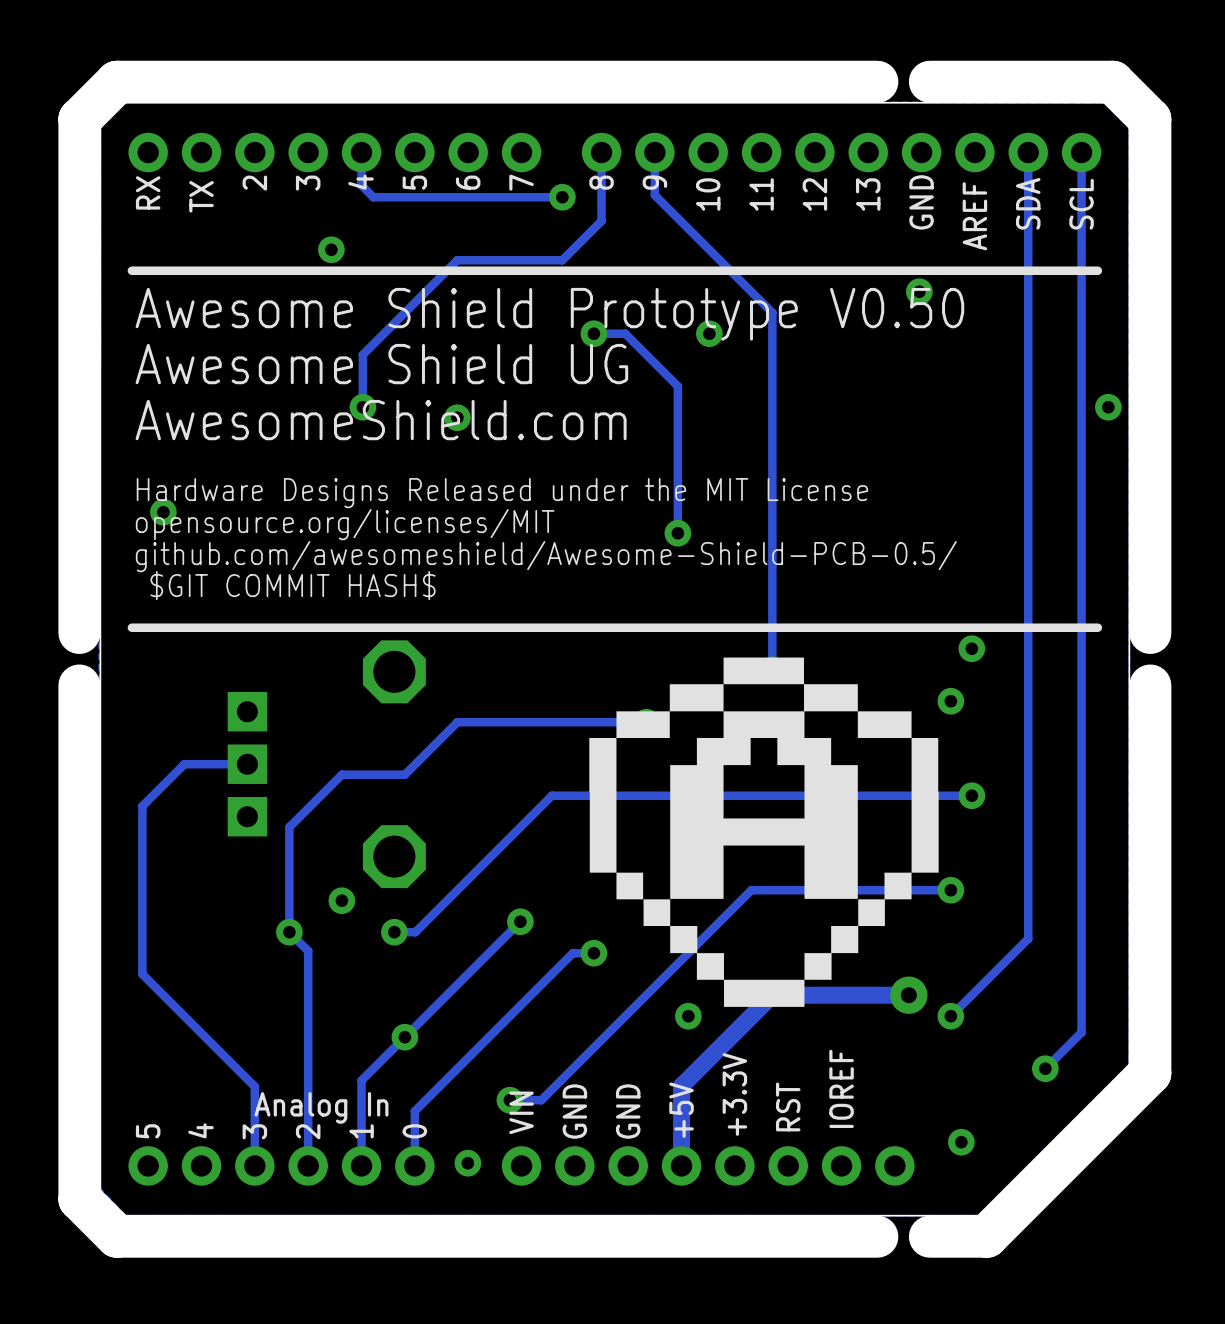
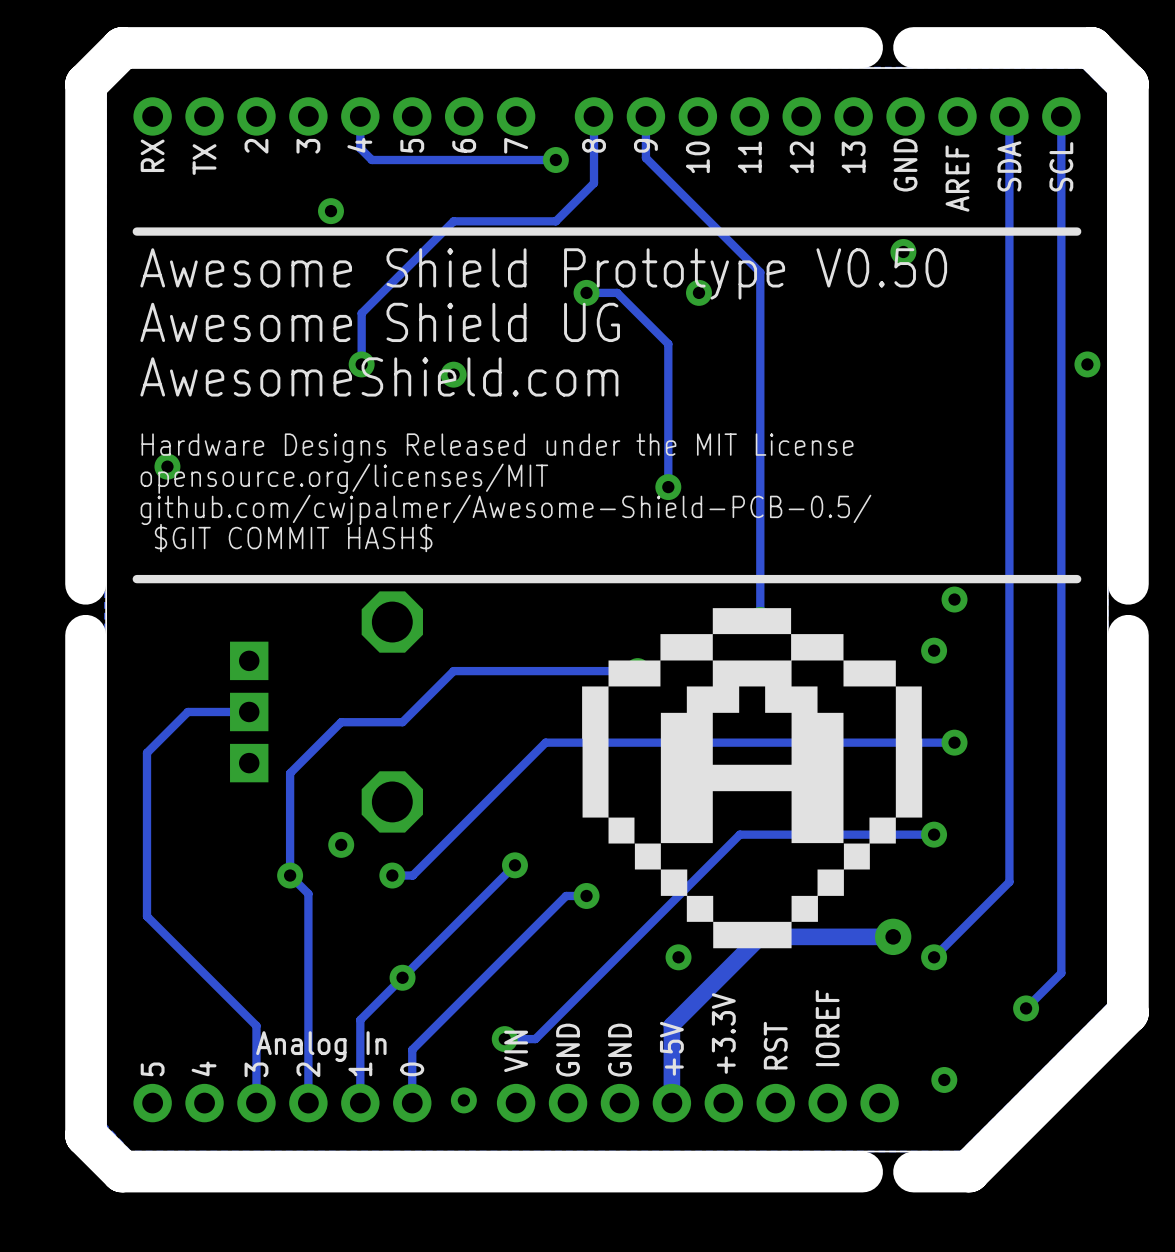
text: github.com/awesomeshield/Awesome-Shield-PCB-0.5/ (546, 556) -> github.com/cwjpalmer/Awesome-Shield-PCB-0.5/ (505, 509)

